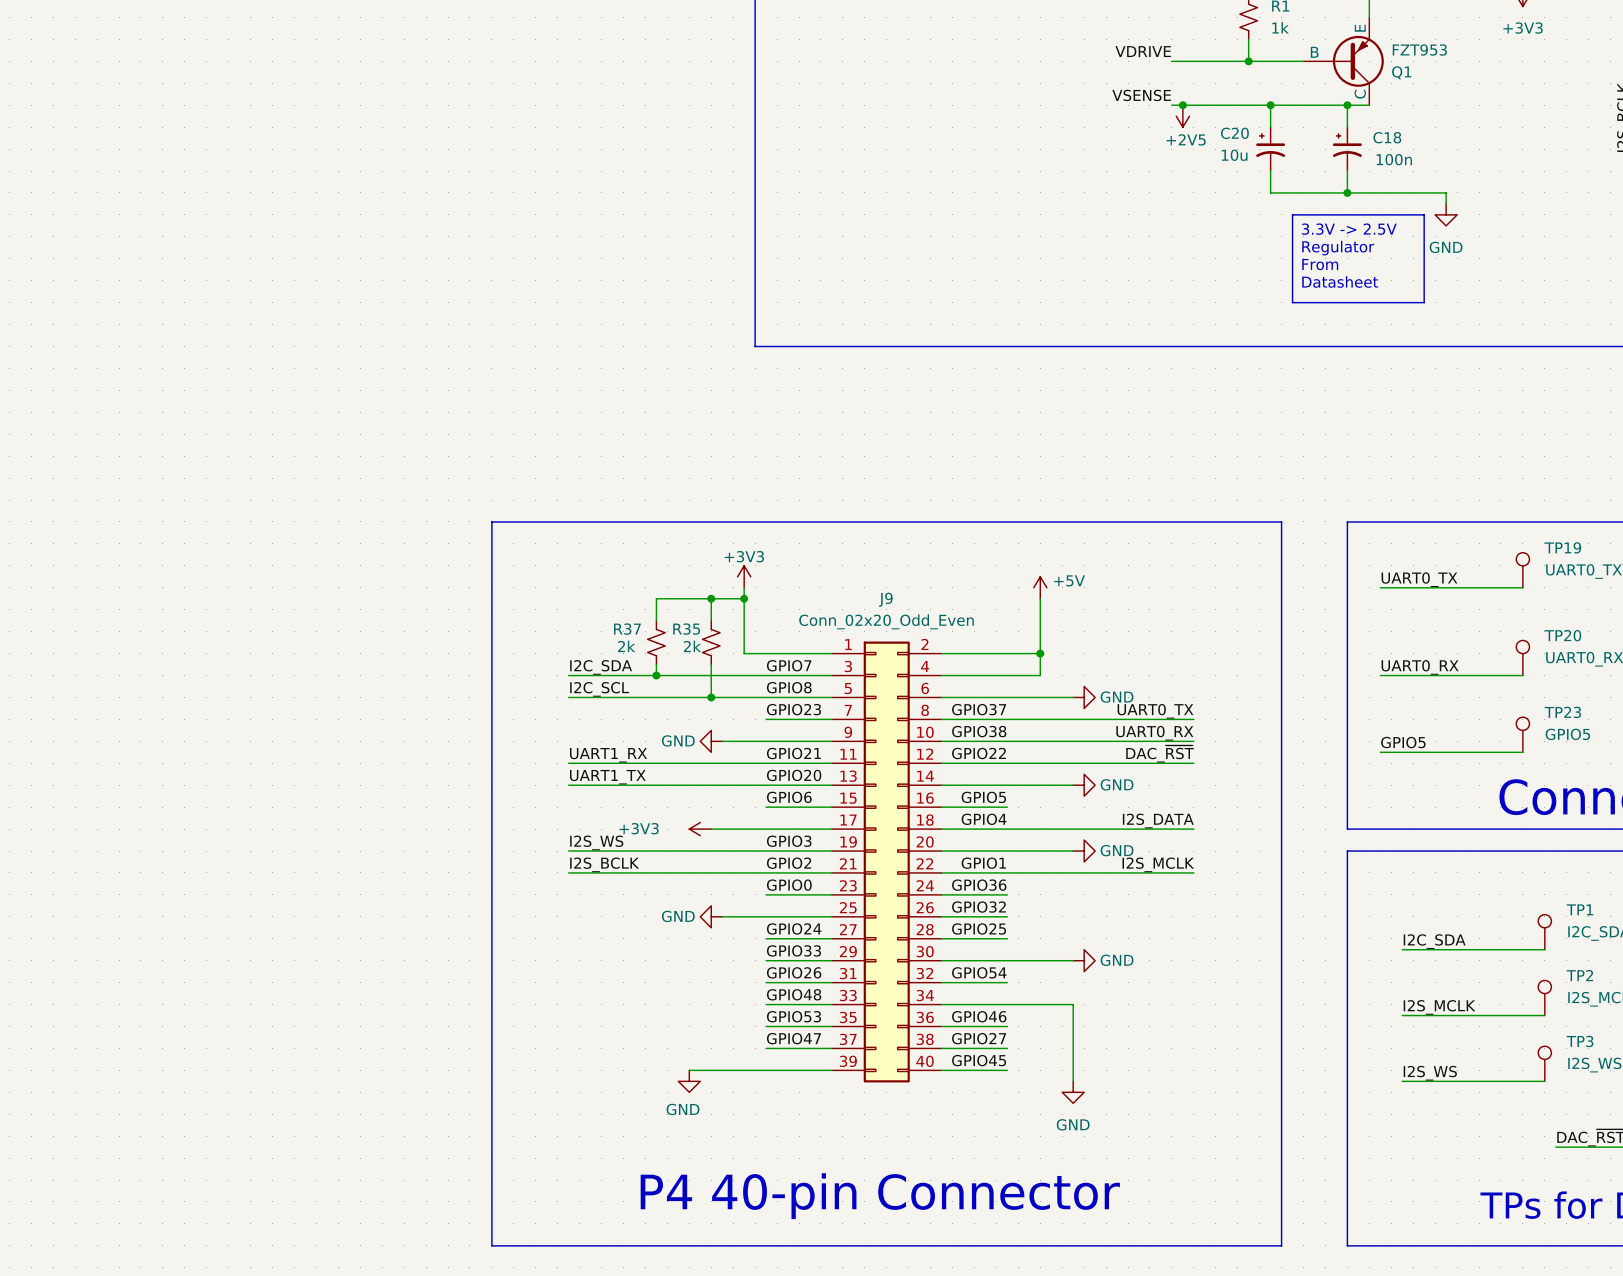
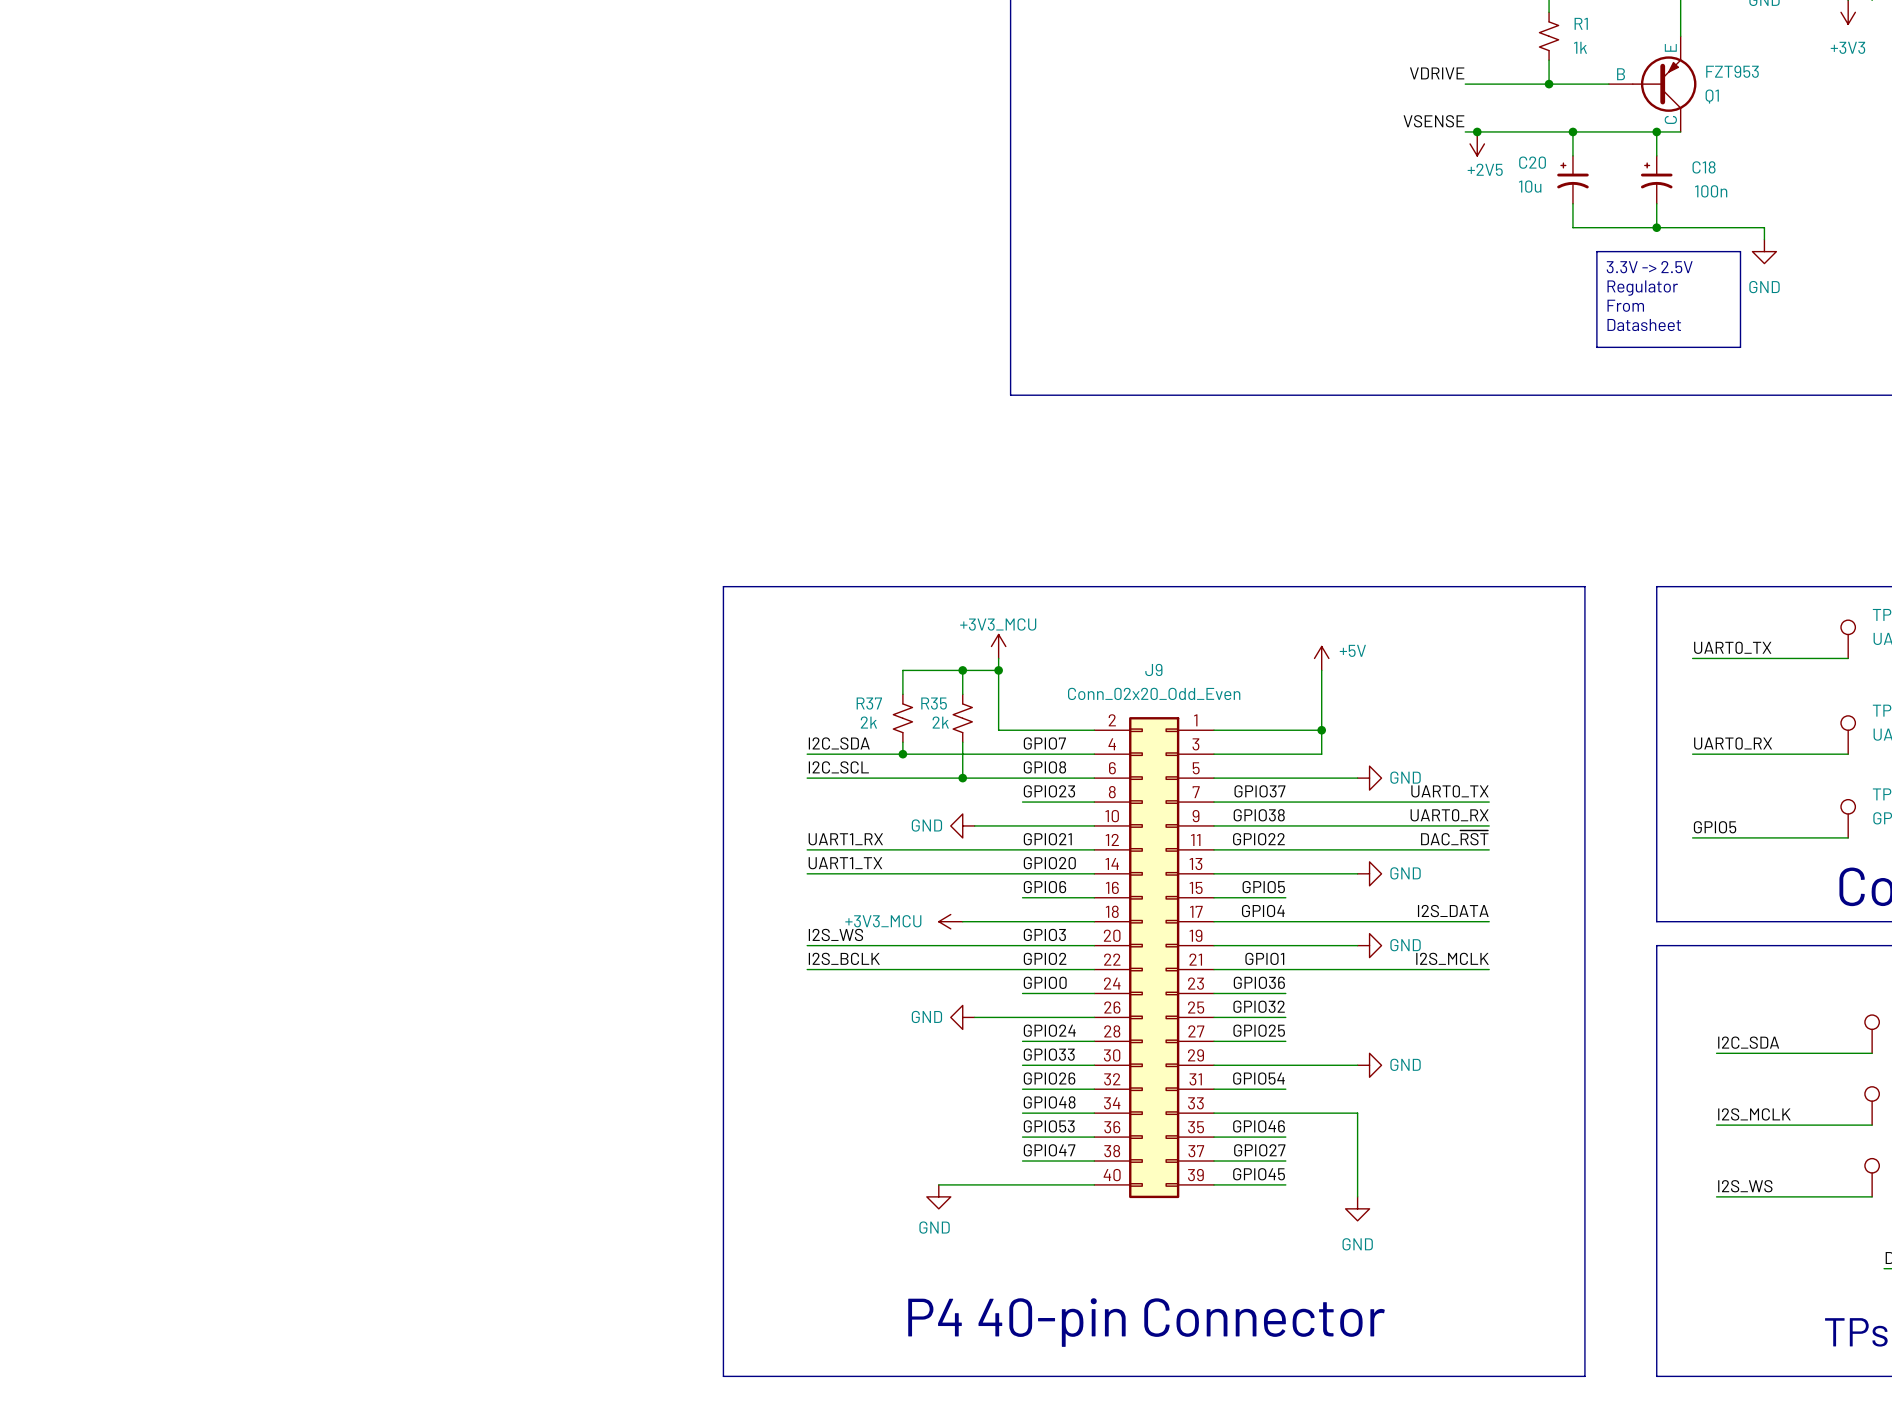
power symbol: +3V3 (744, 576) -> +3V3_MCU (998, 646)
power symbol: +3V3 (700, 829) -> +3V3_MCU (950, 921)
J9 flip: as is (886, 861) -> left-right (1154, 957)

